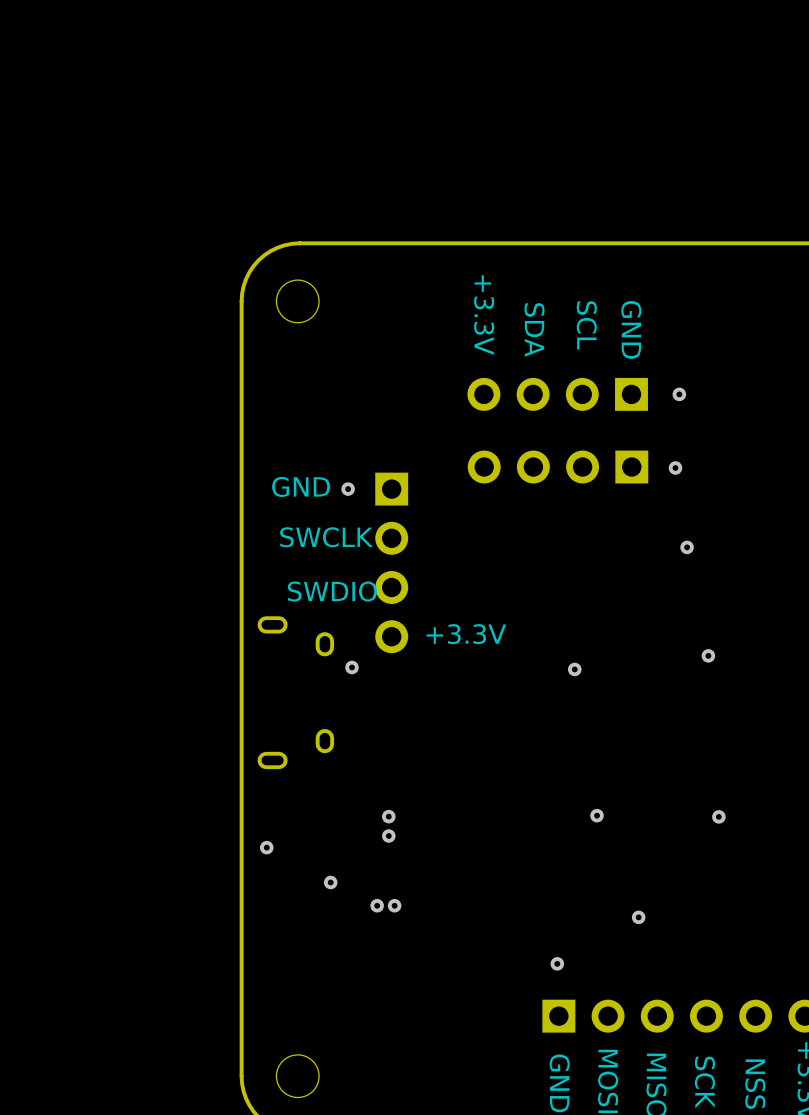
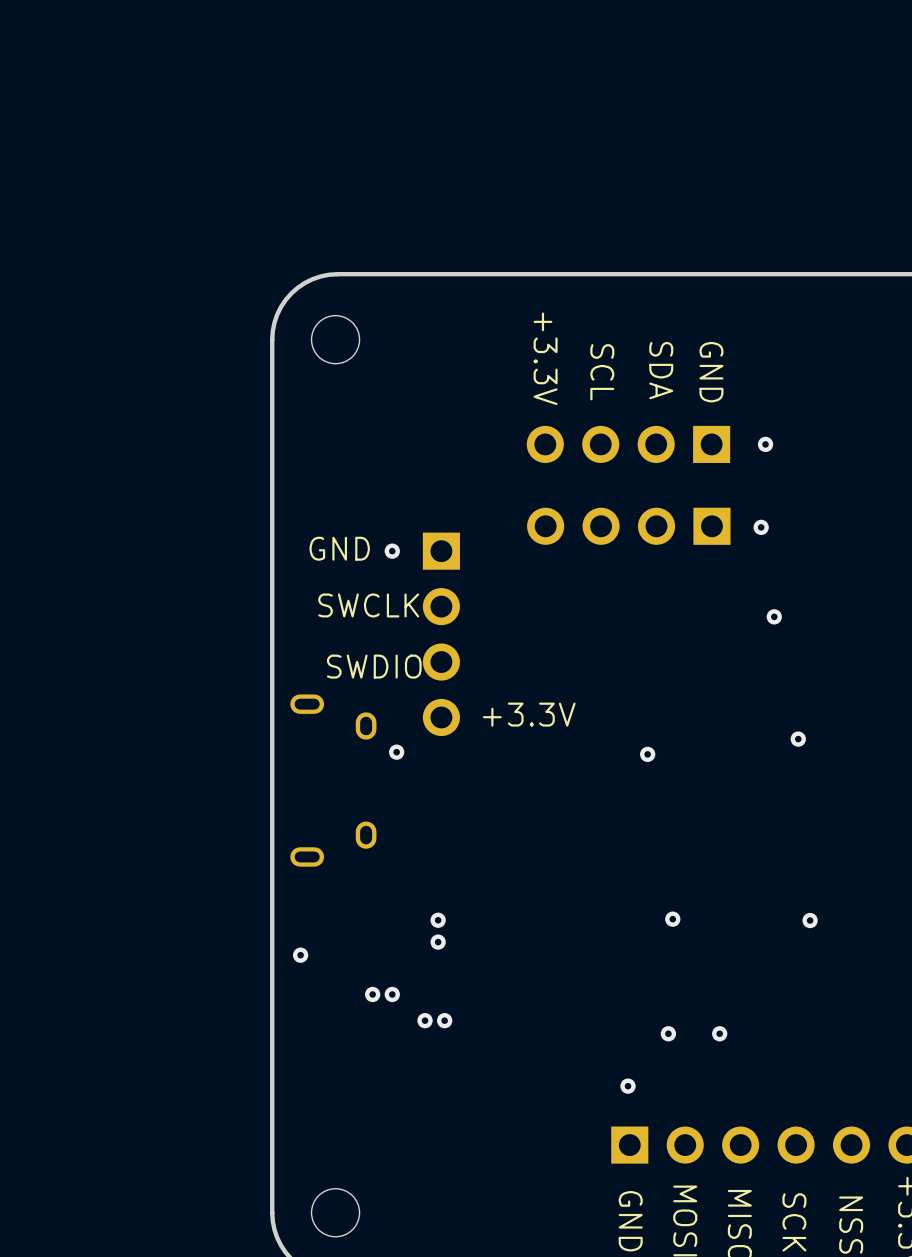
text: SCL (586, 325) -> SDA (661, 370)
text: SDA (534, 329) -> SCL (602, 372)
via: none -> (392, 994)
via: none -> (668, 1033)

